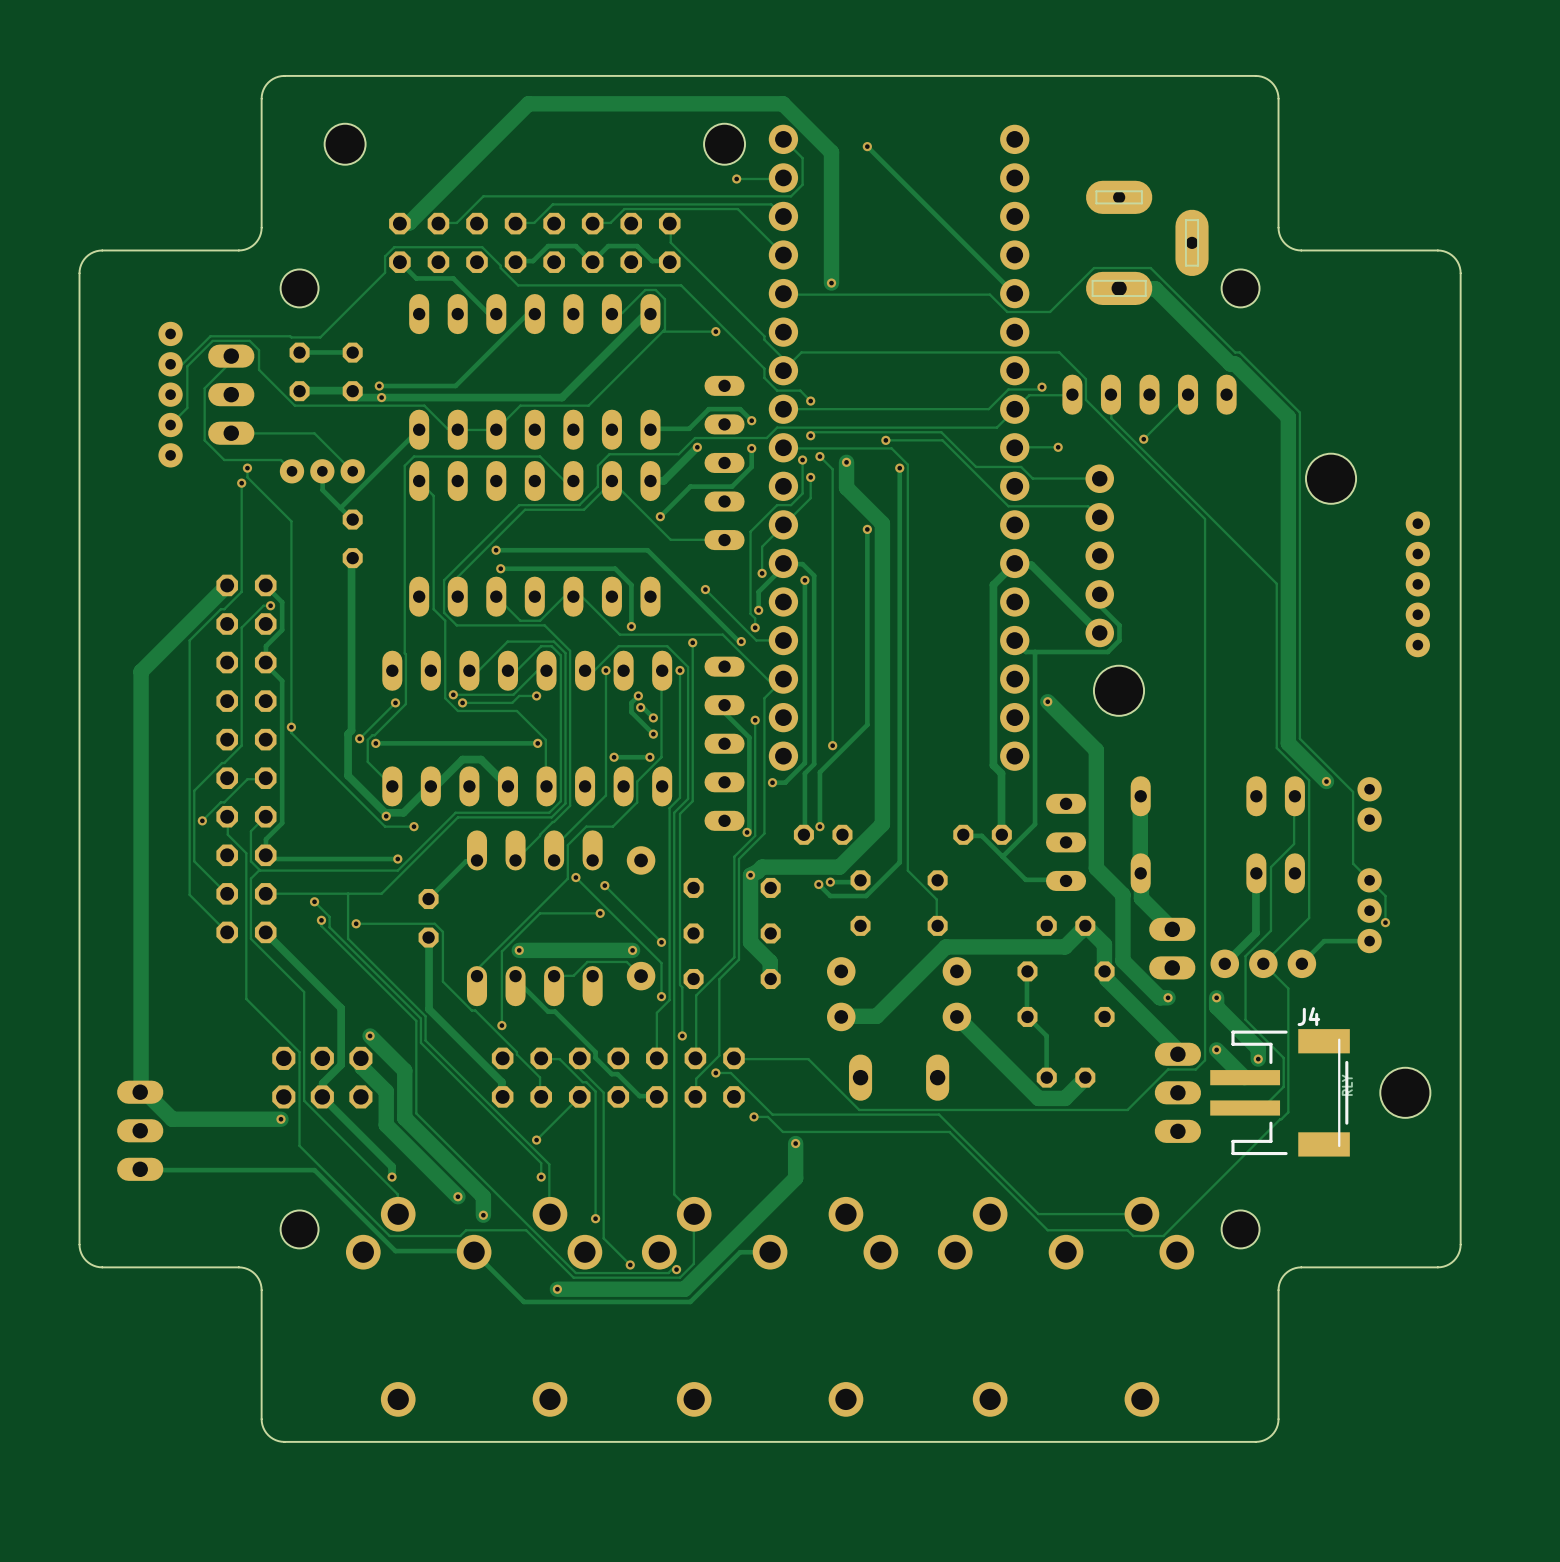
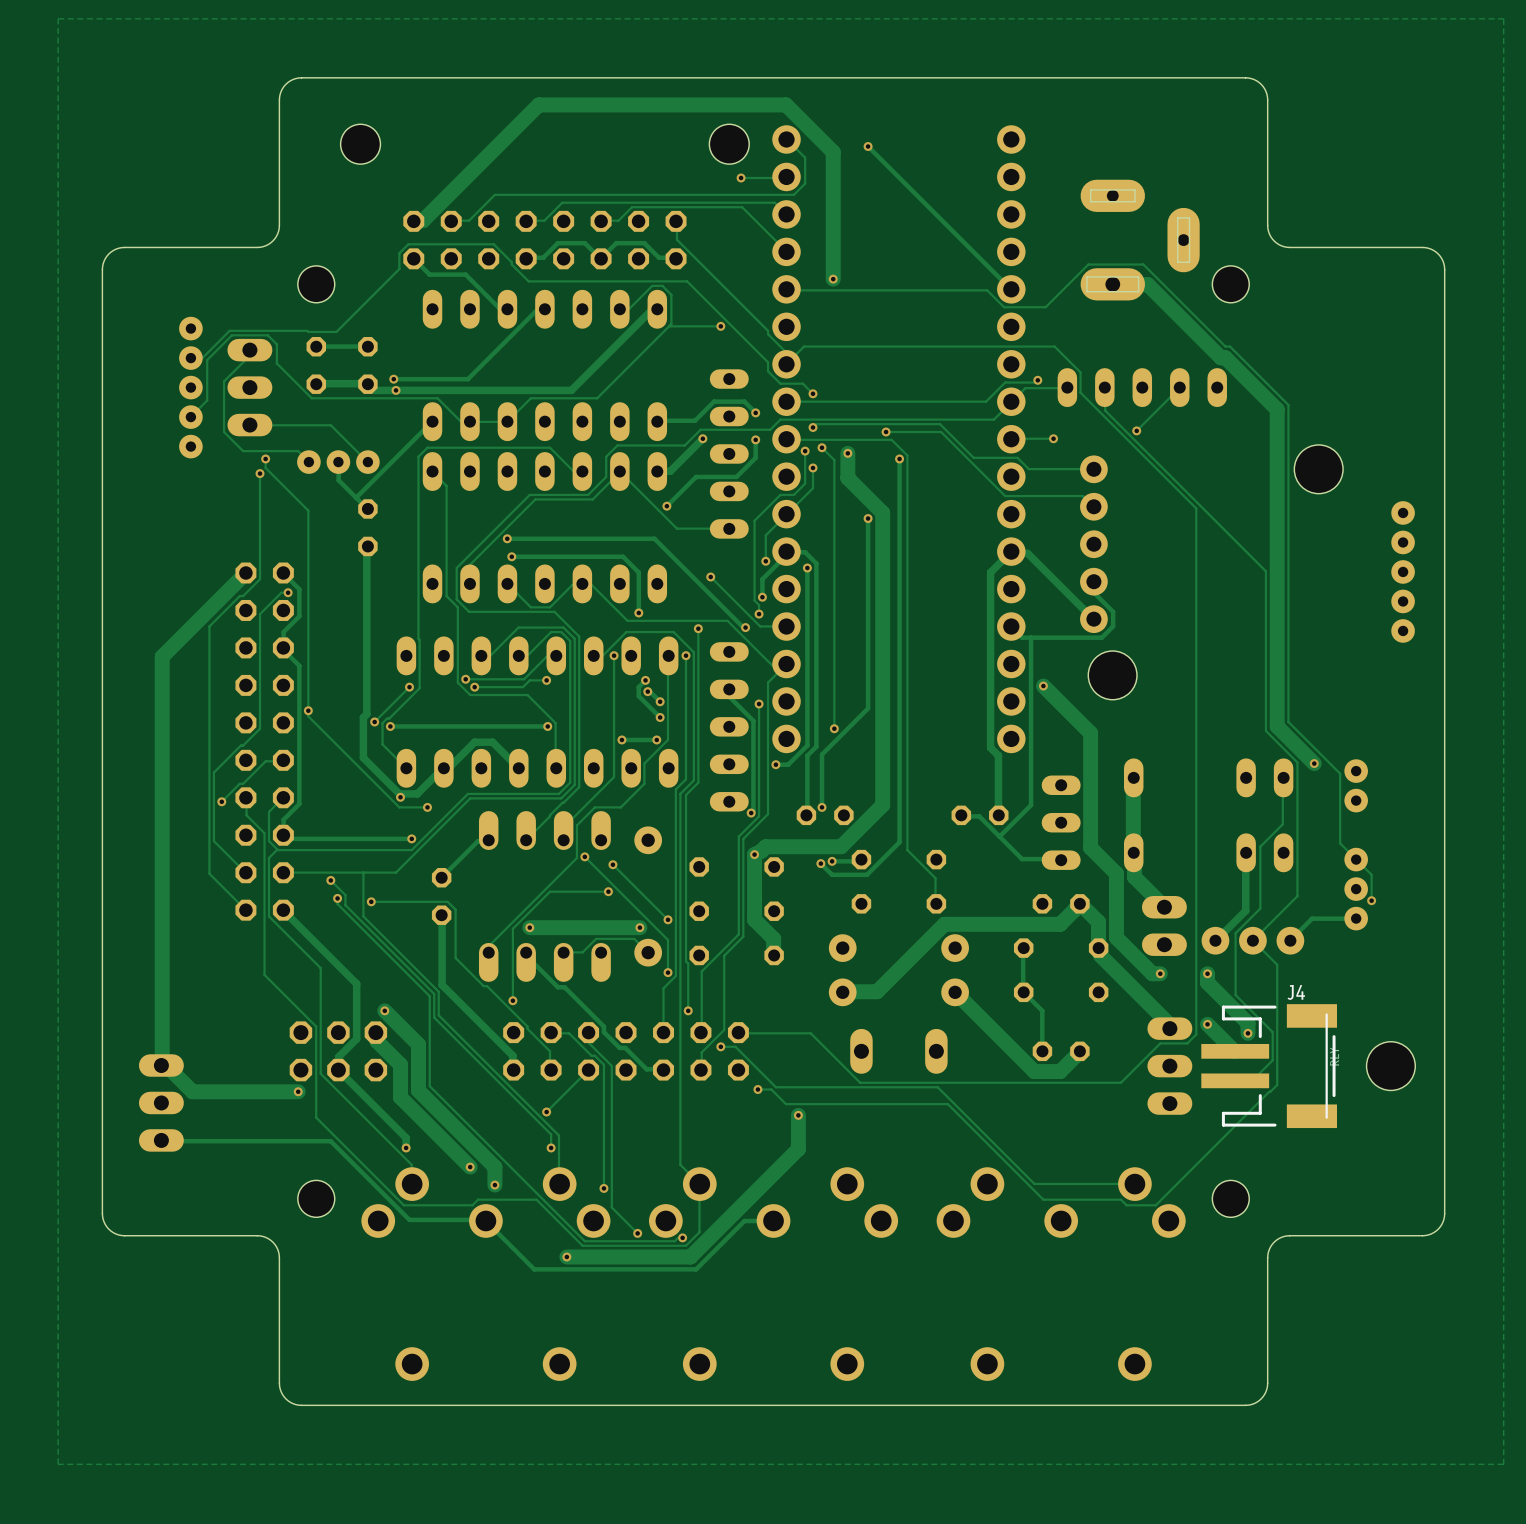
zone outline: none -> (1503, 18) (58, 18) (58, 1464) (1503, 1464) (1503, 18)

